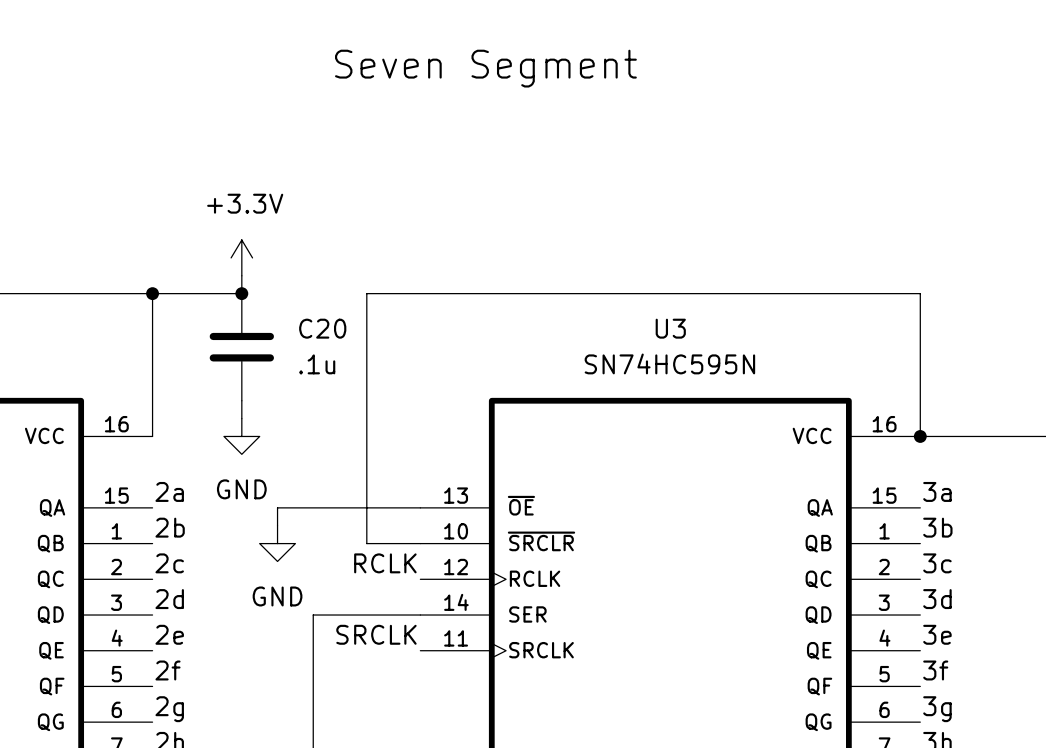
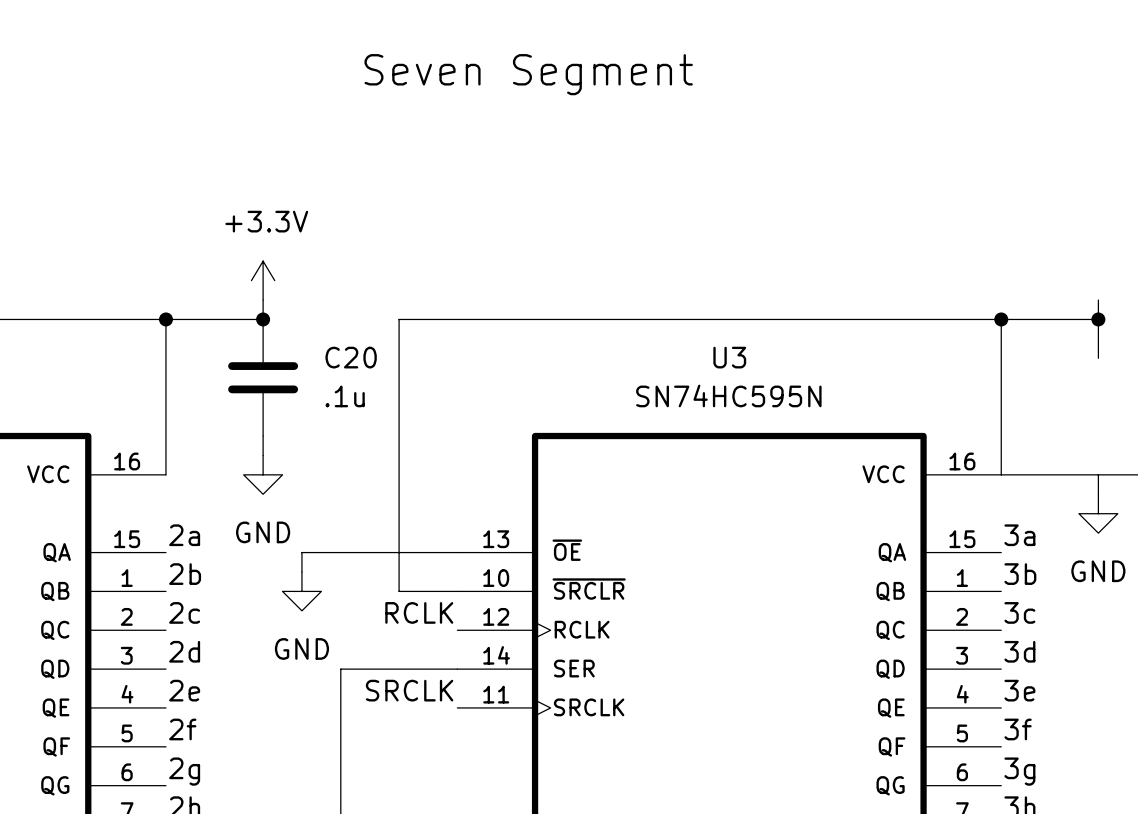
wire: none -> (1098, 300) (1098, 358)
wire: none -> (1001, 319) (1098, 319)
junction: none -> (1001, 319)
junction: none -> (1098, 319)
junction: (920, 436) -> none
wire: none -> (1098, 474) (1098, 494)
power symbol: none -> GND (1098, 513)

